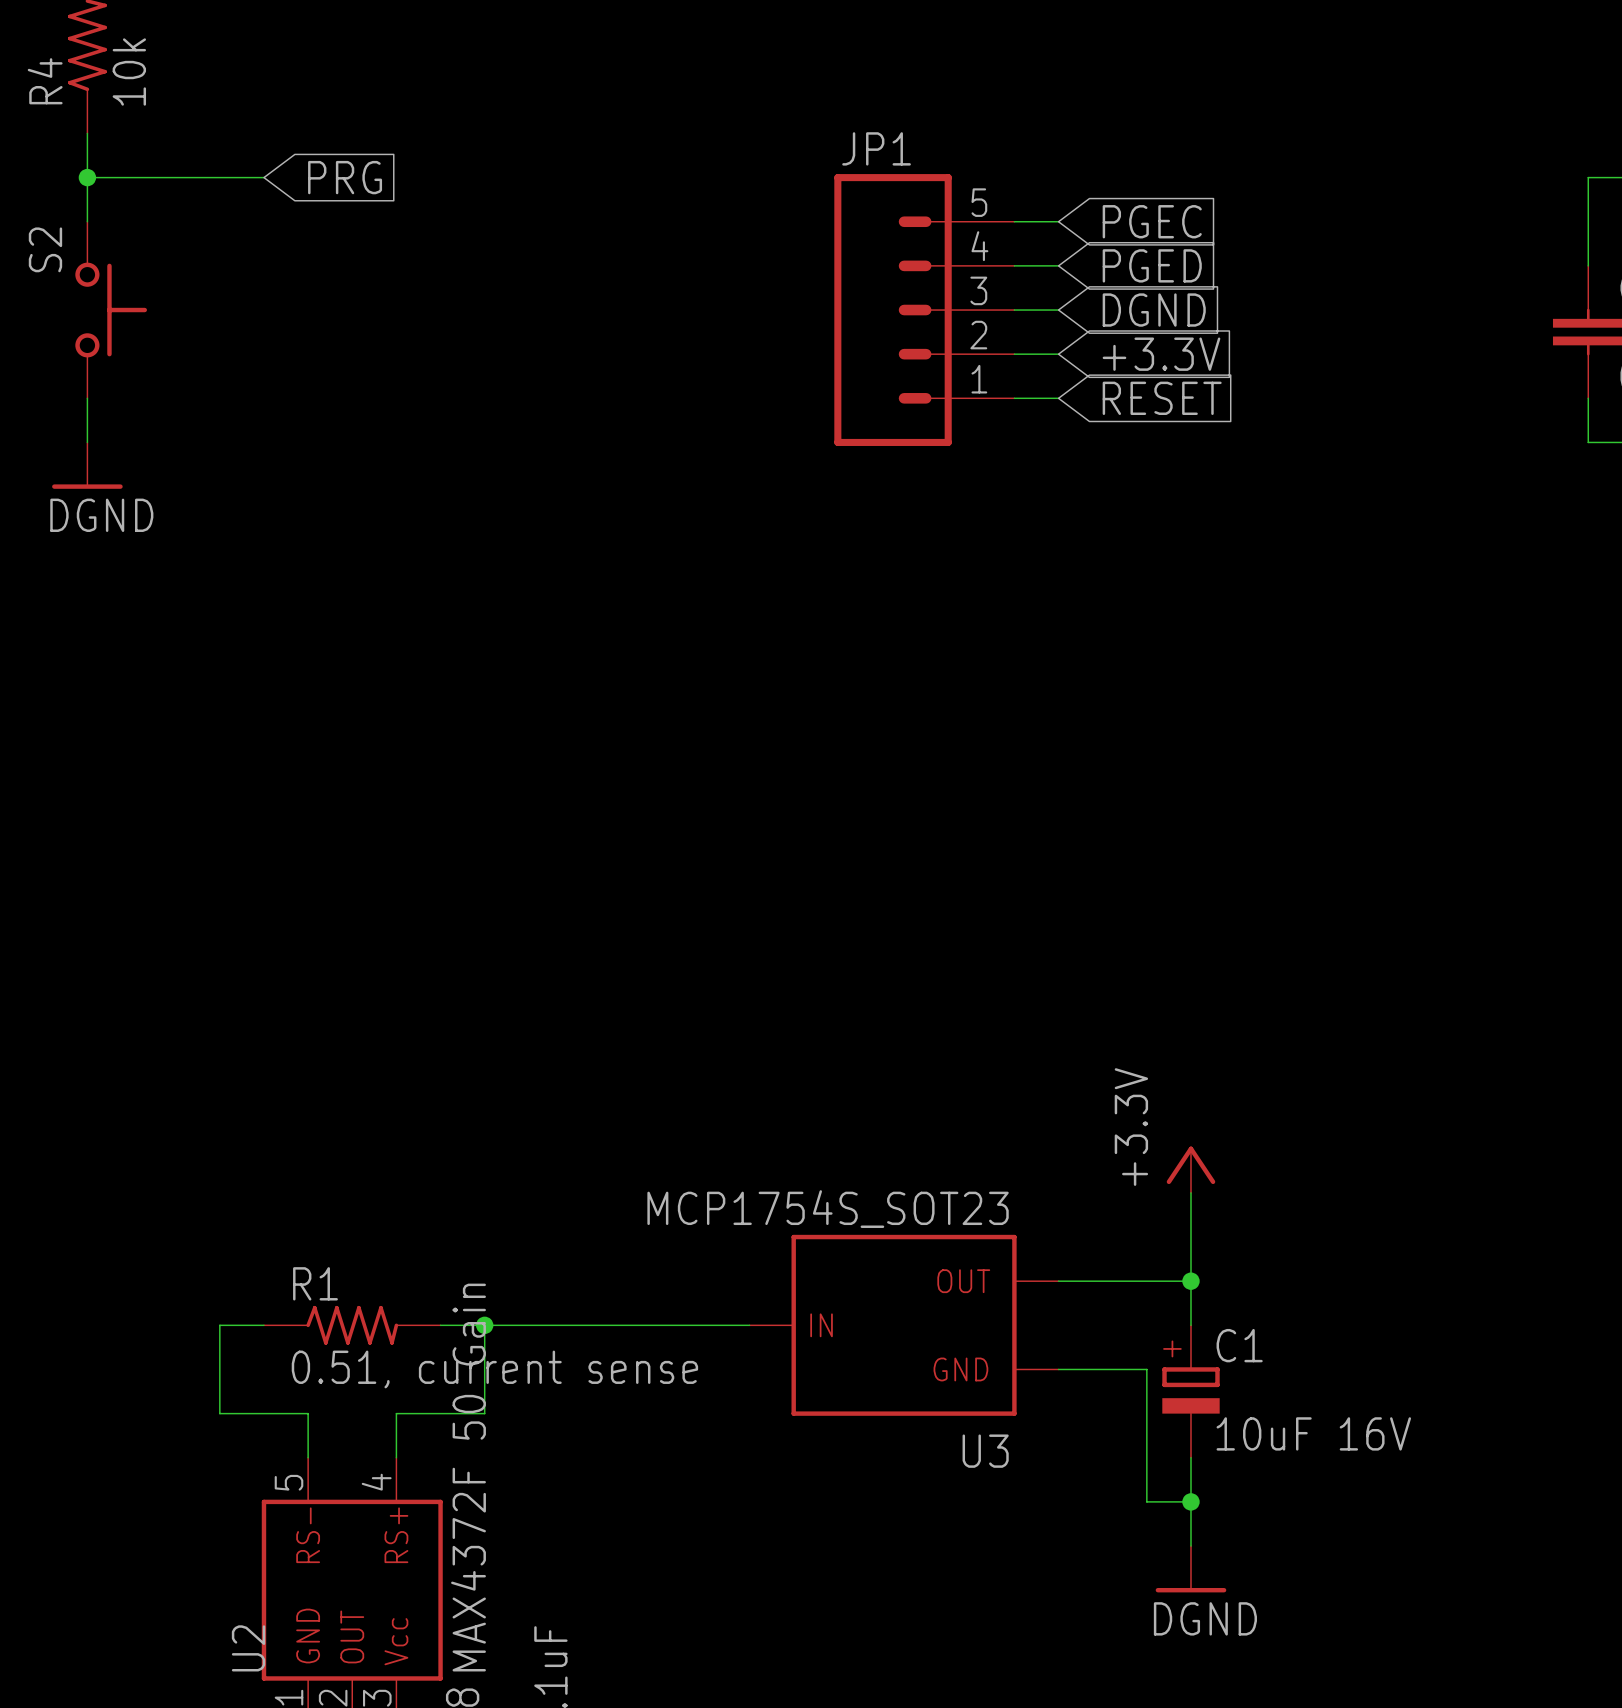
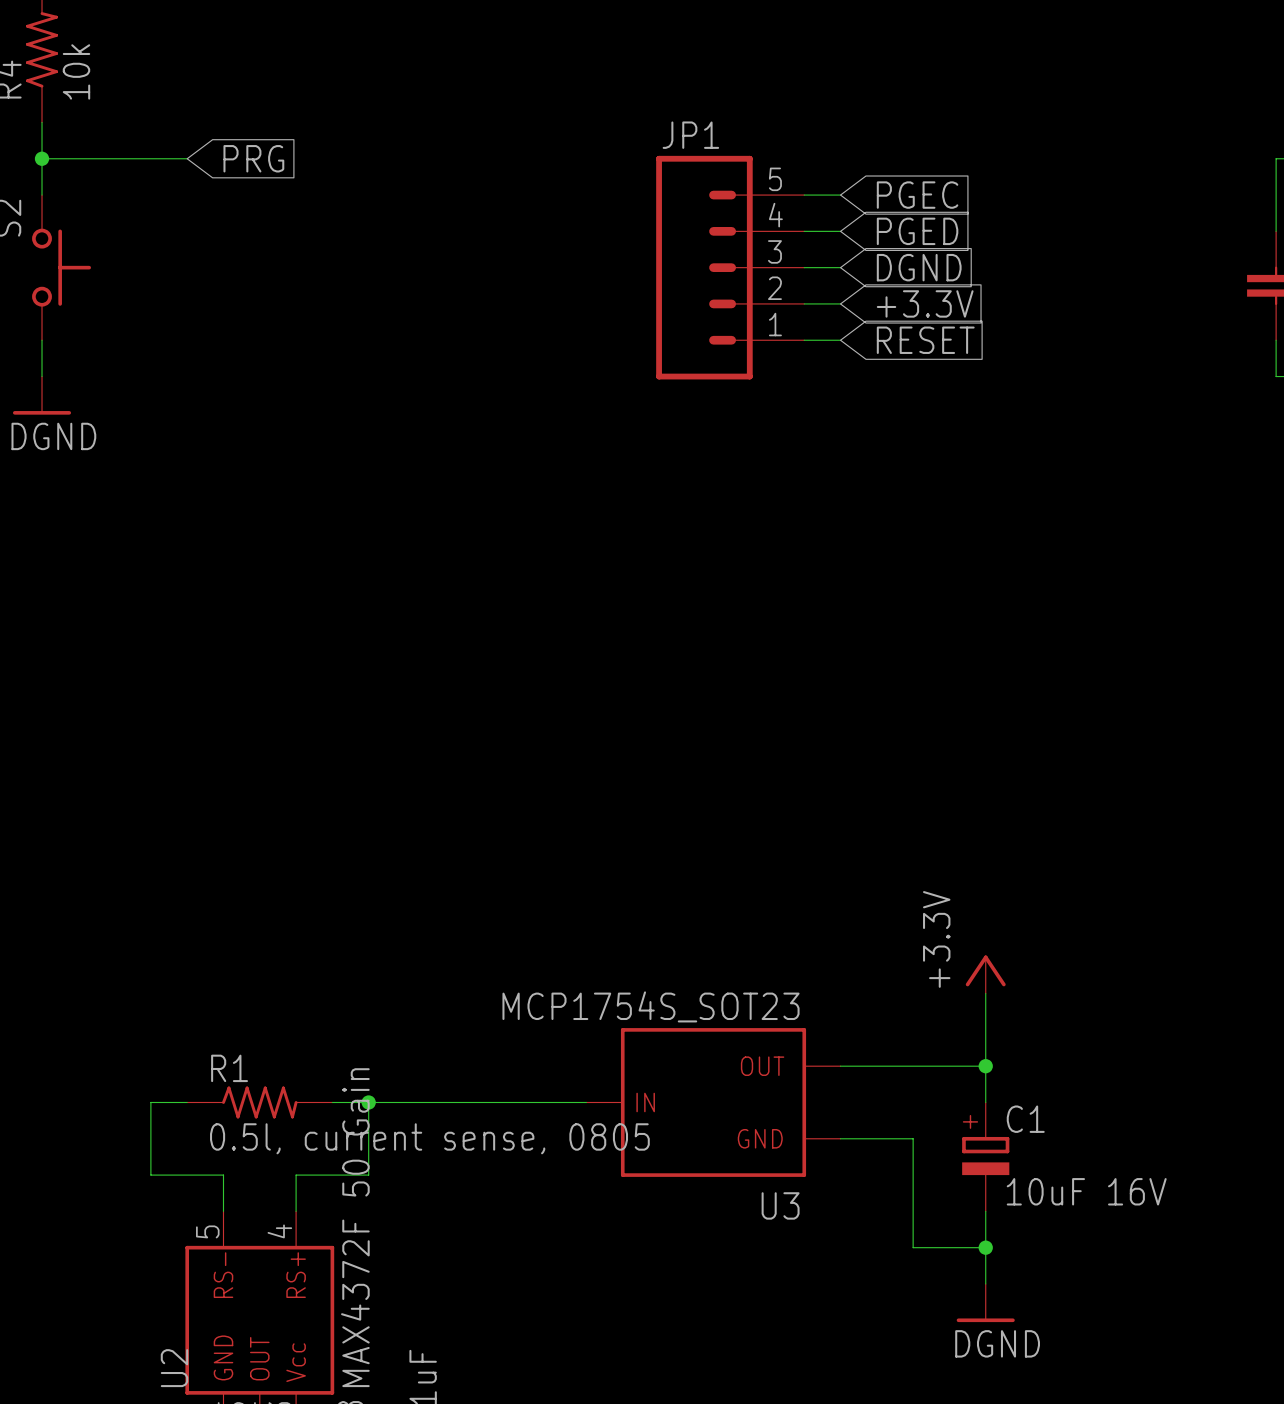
power symbol position: +3.3V (1190, 1169) -> +3.3V (985, 974)
wire: (1190, 1192) (1190, 1325) -> (985, 993) (985, 1102)
wire: none -> (949, 1066) (985, 1066)
junction position: (1190, 1281) -> (985, 1066)
R1 value: 0.51, current sense (494, 1369) -> 0.5l, current sense, 0805 (429, 1138)
C1 position: (1190, 1391) -> (985, 1156)
wire: (1190, 1457) (1190, 1546) -> (985, 1211) (985, 1283)
wire: none -> (949, 1247) (985, 1247)
junction position: (1190, 1501) -> (985, 1247)
power symbol position: DGND (1190, 1569) -> DGND (985, 1303)

